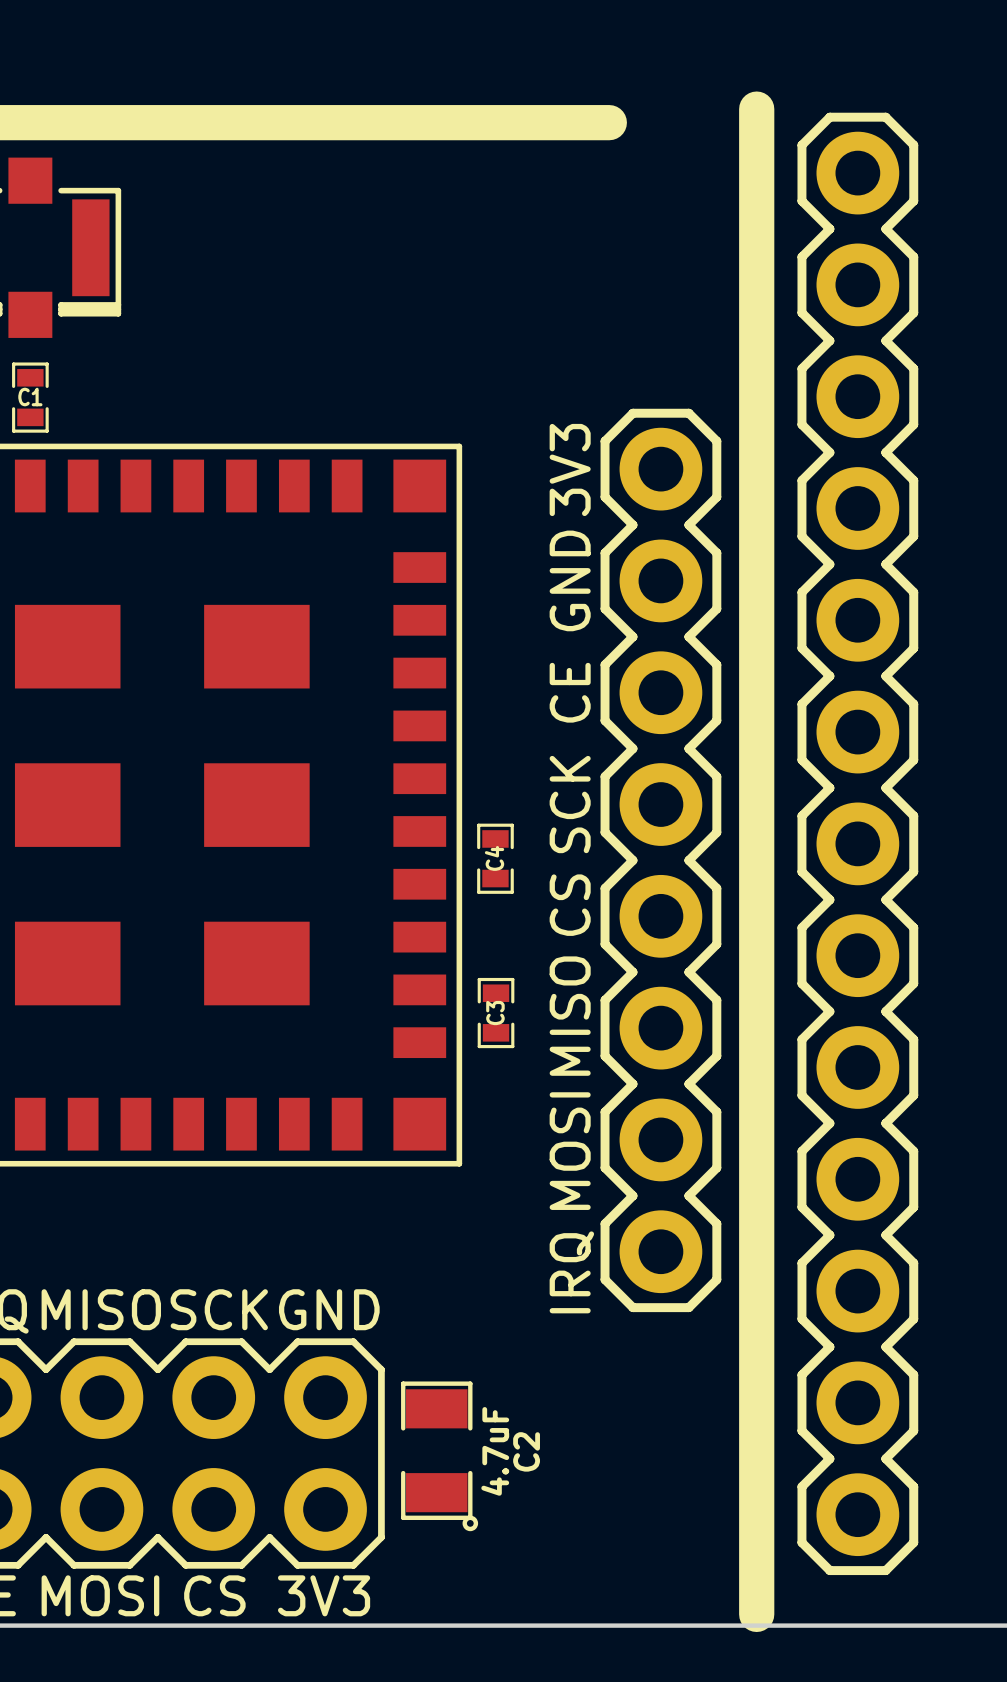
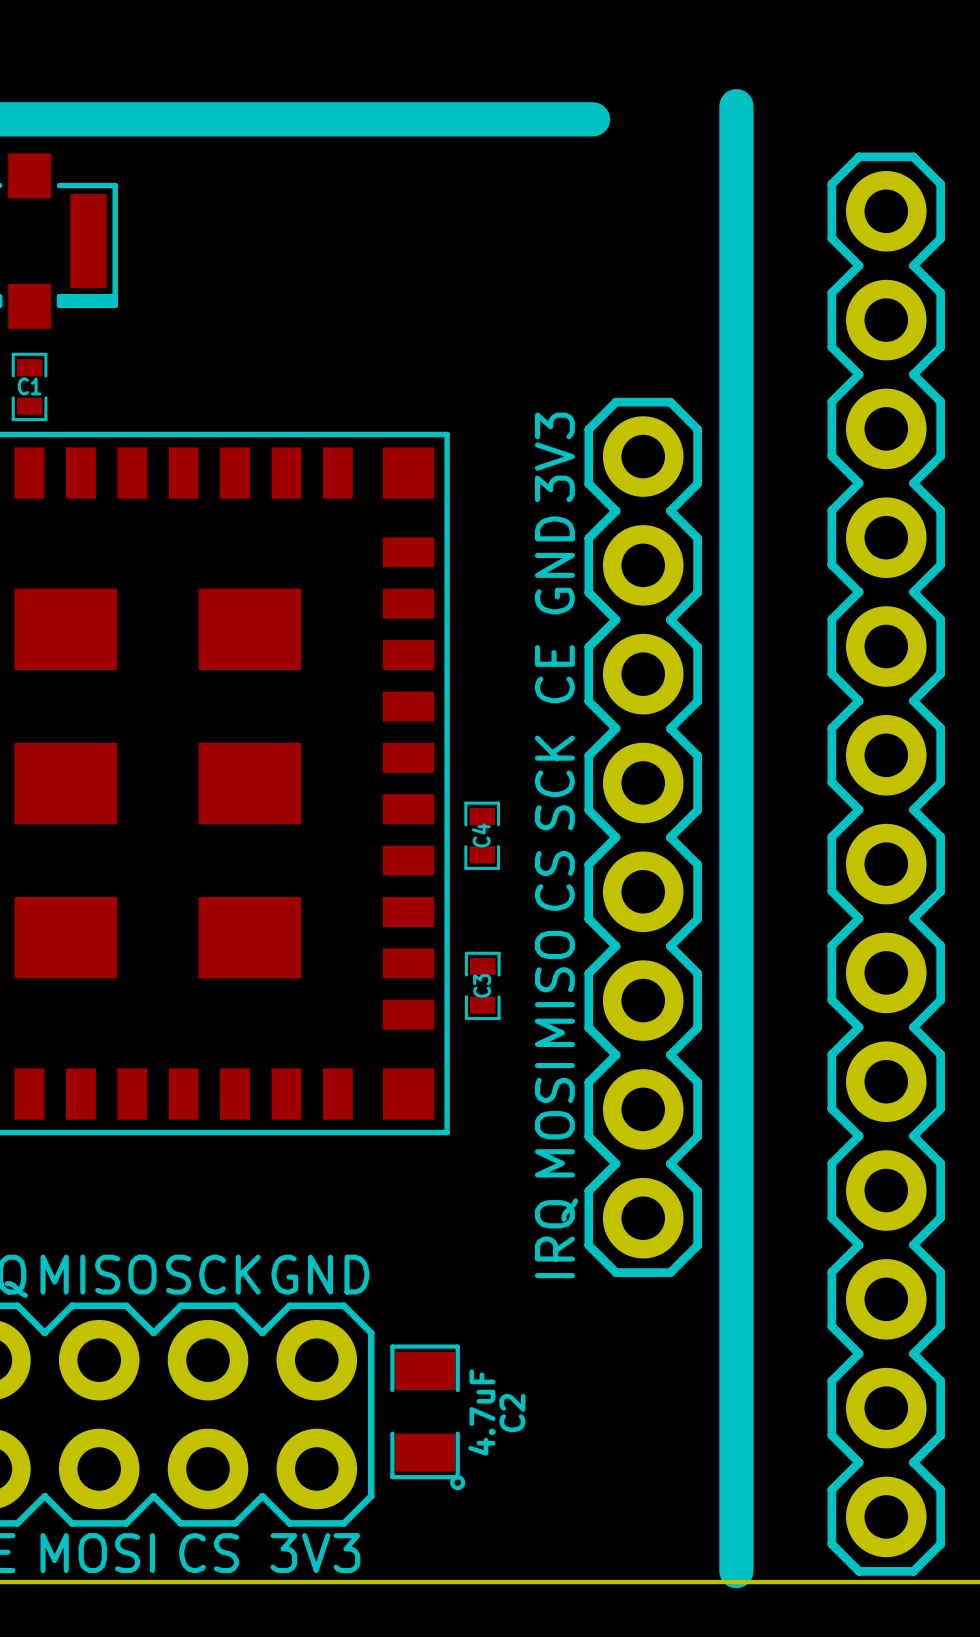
part position: (857, 843) -> (886, 864)

